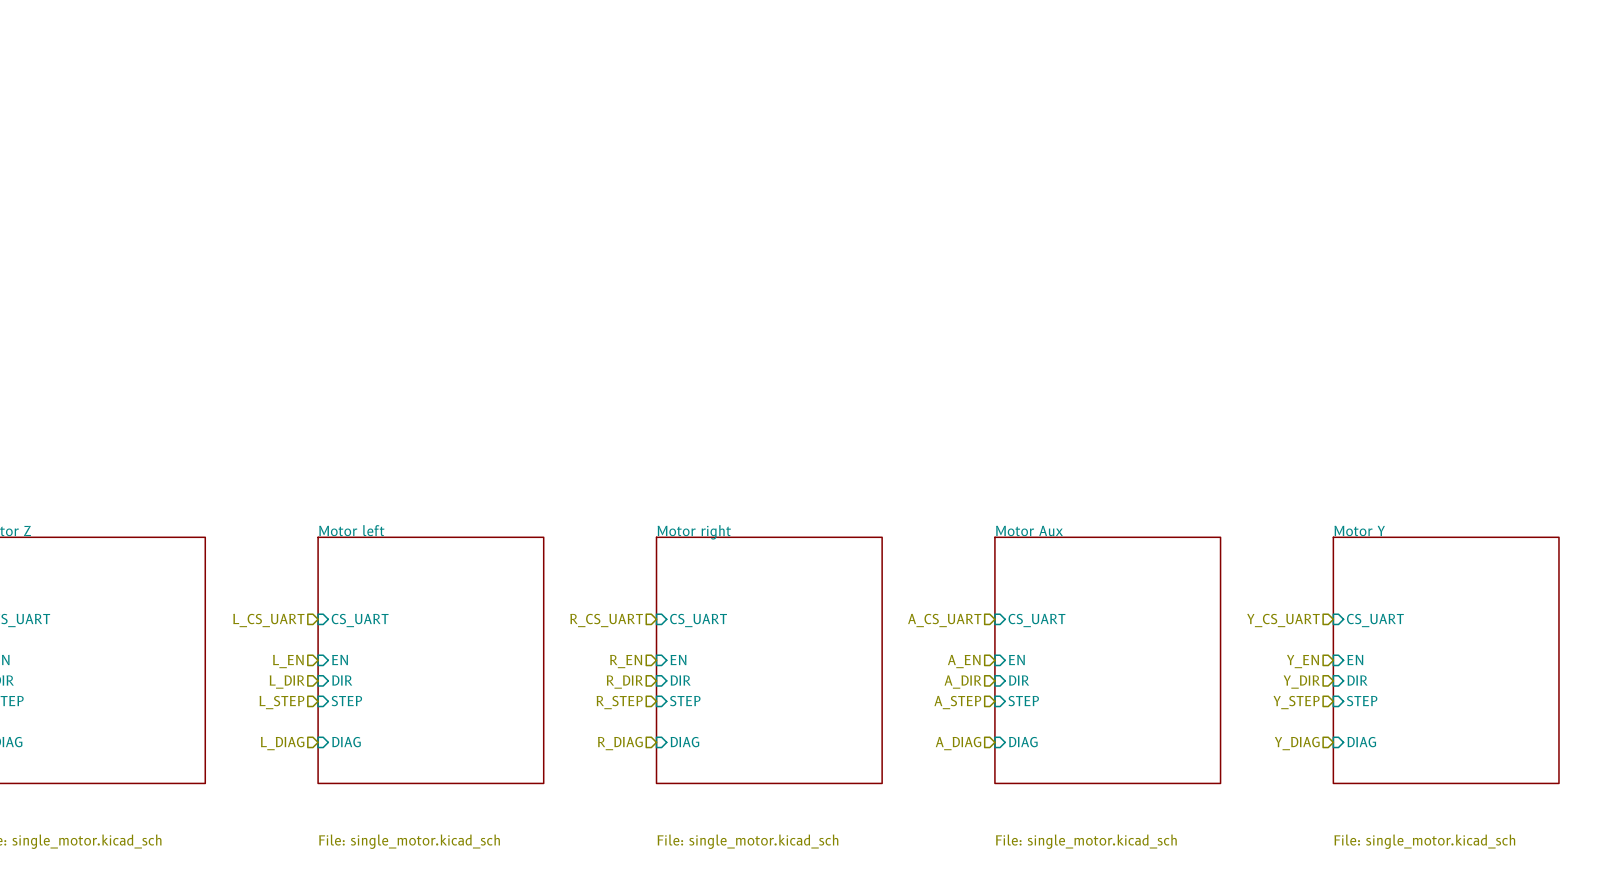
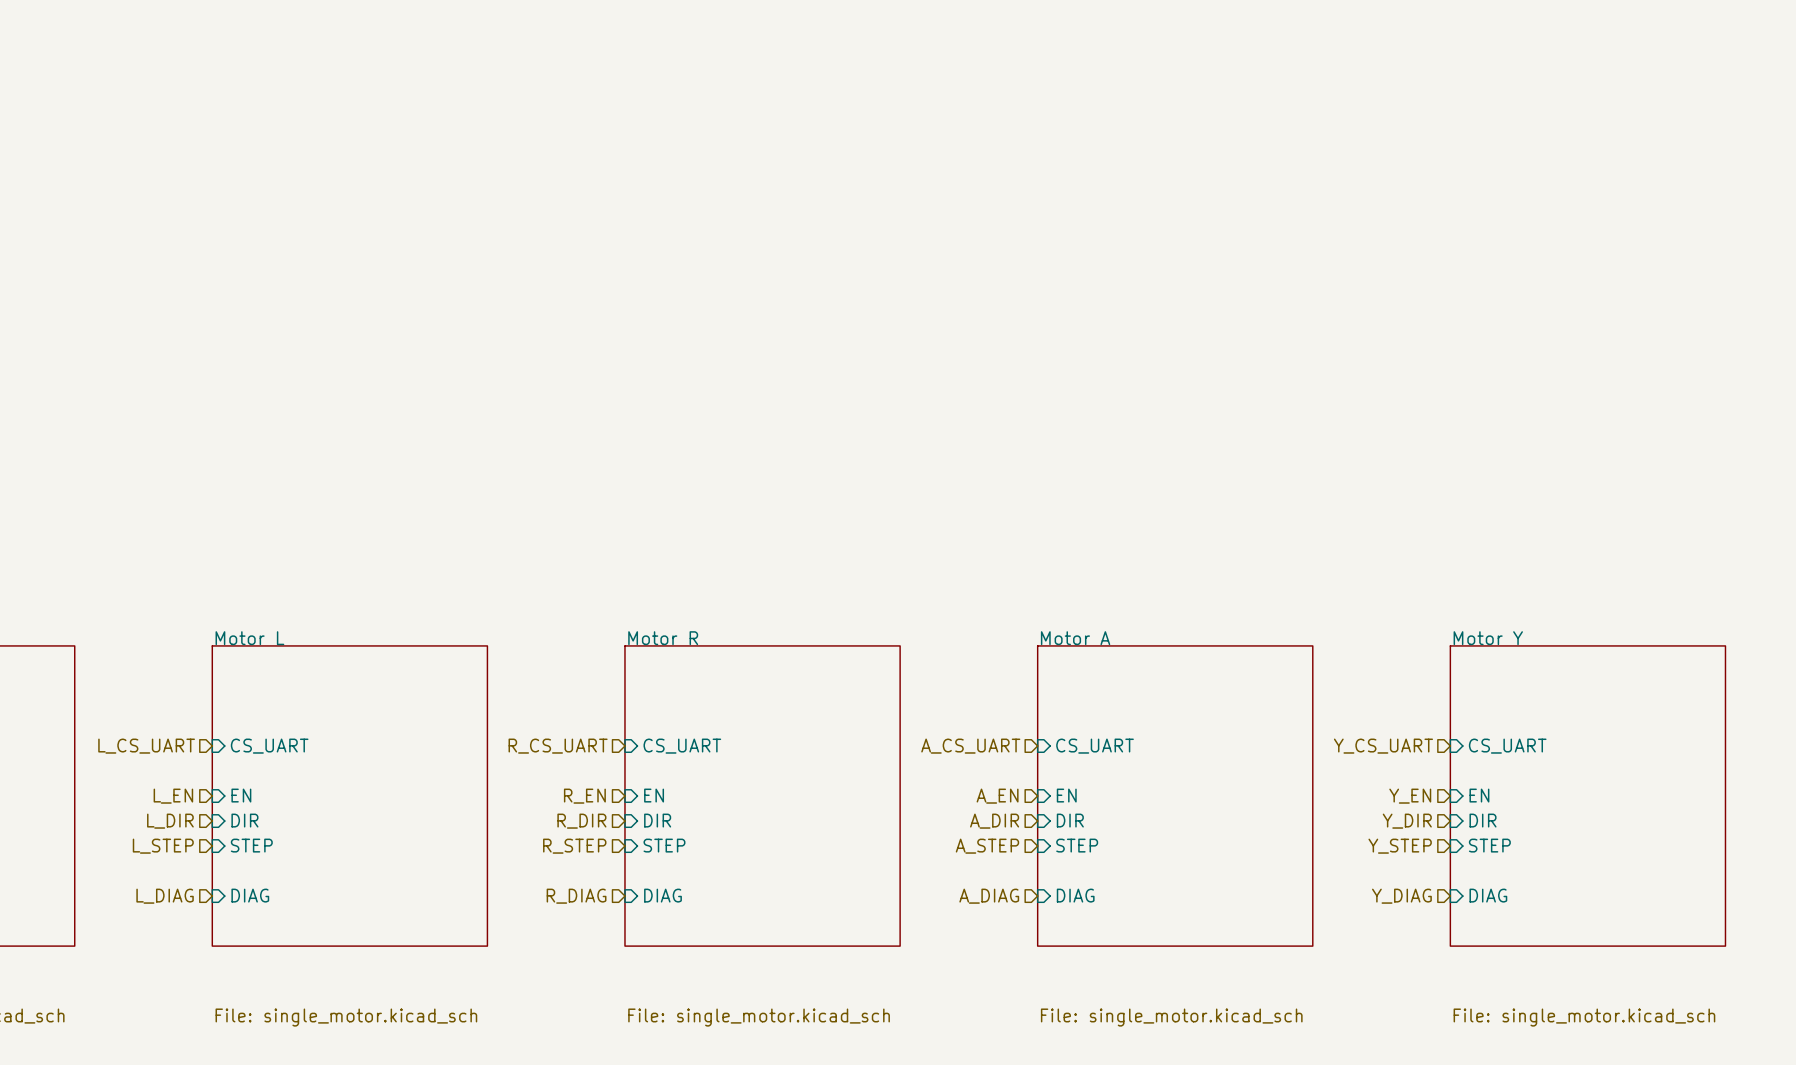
sheet Motor left name: Motor left (351, 530) -> Motor L (249, 638)
sheet Motor Aux name: Motor Aux (1029, 530) -> Motor A (1075, 638)
sheet Motor right name: Motor right (694, 532) -> Motor R (663, 638)

